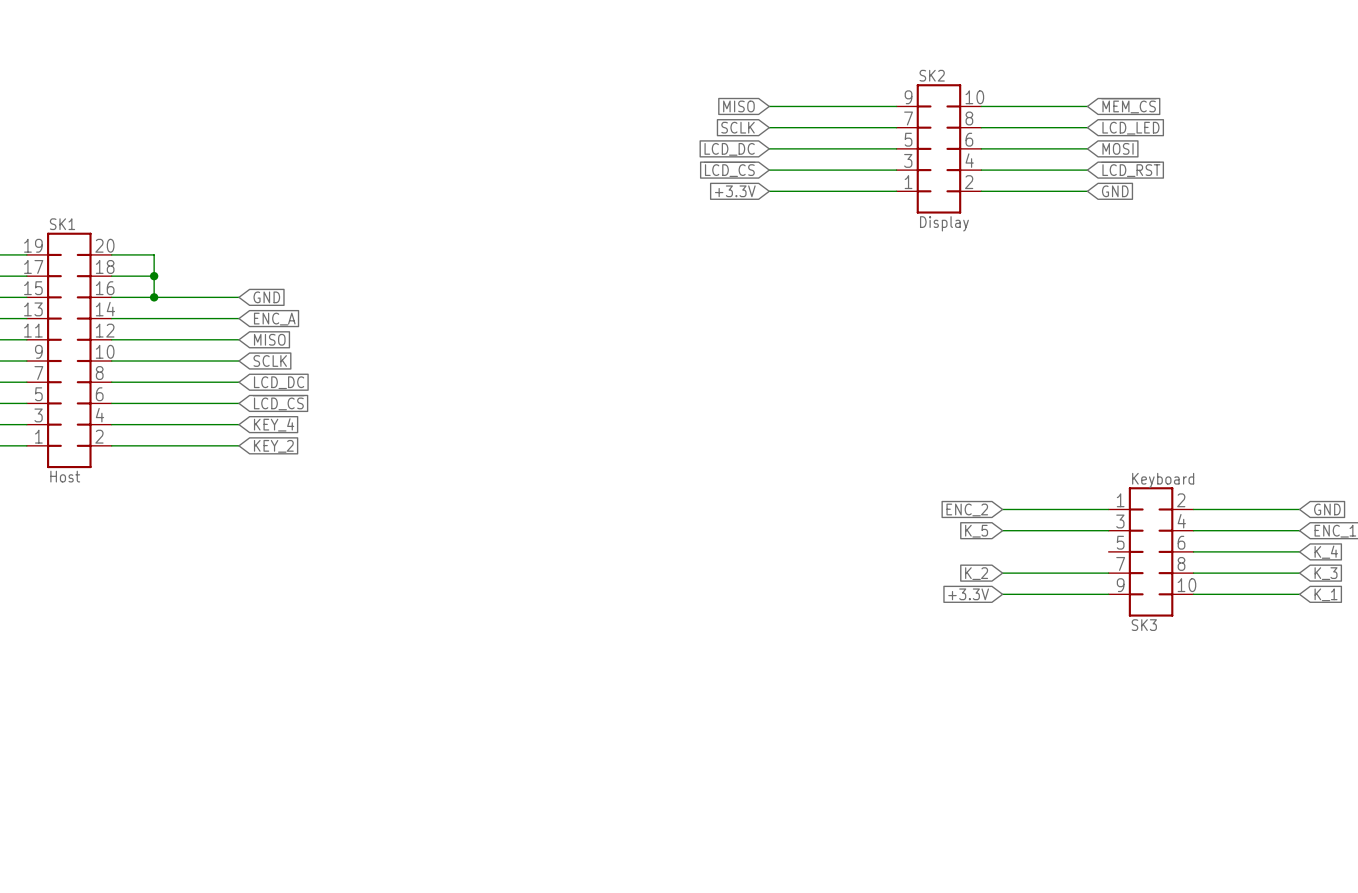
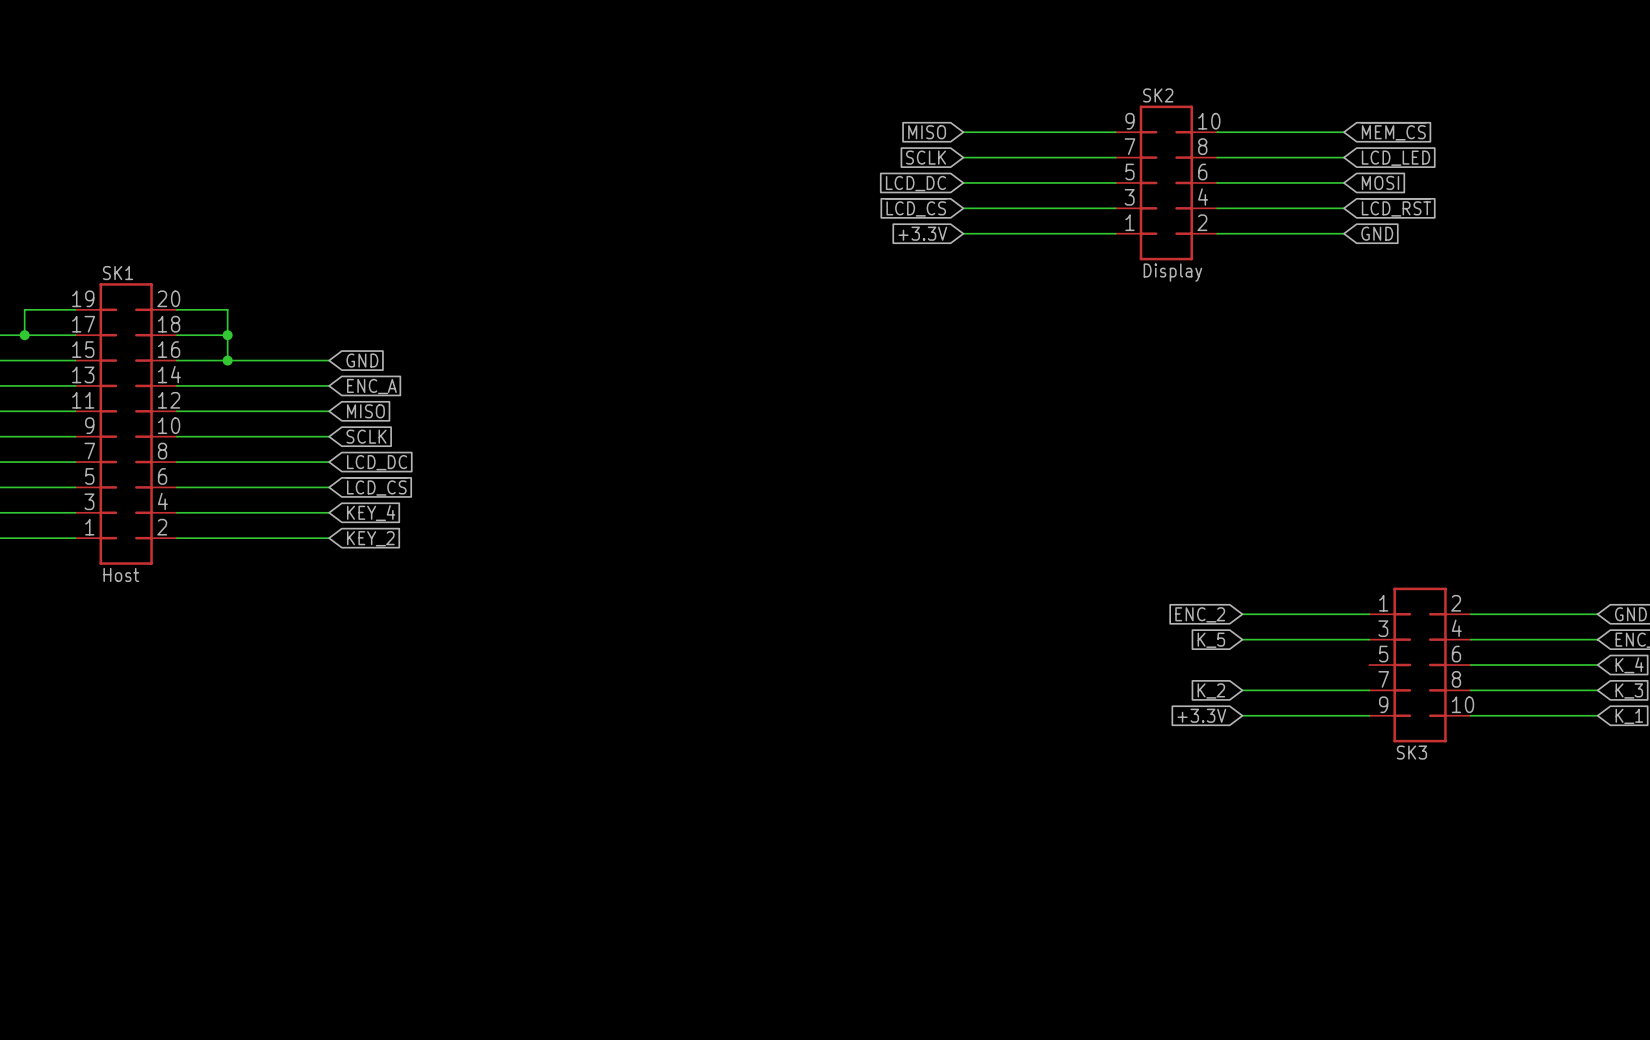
SK3 value: Keyboard (1163, 480) -> none

